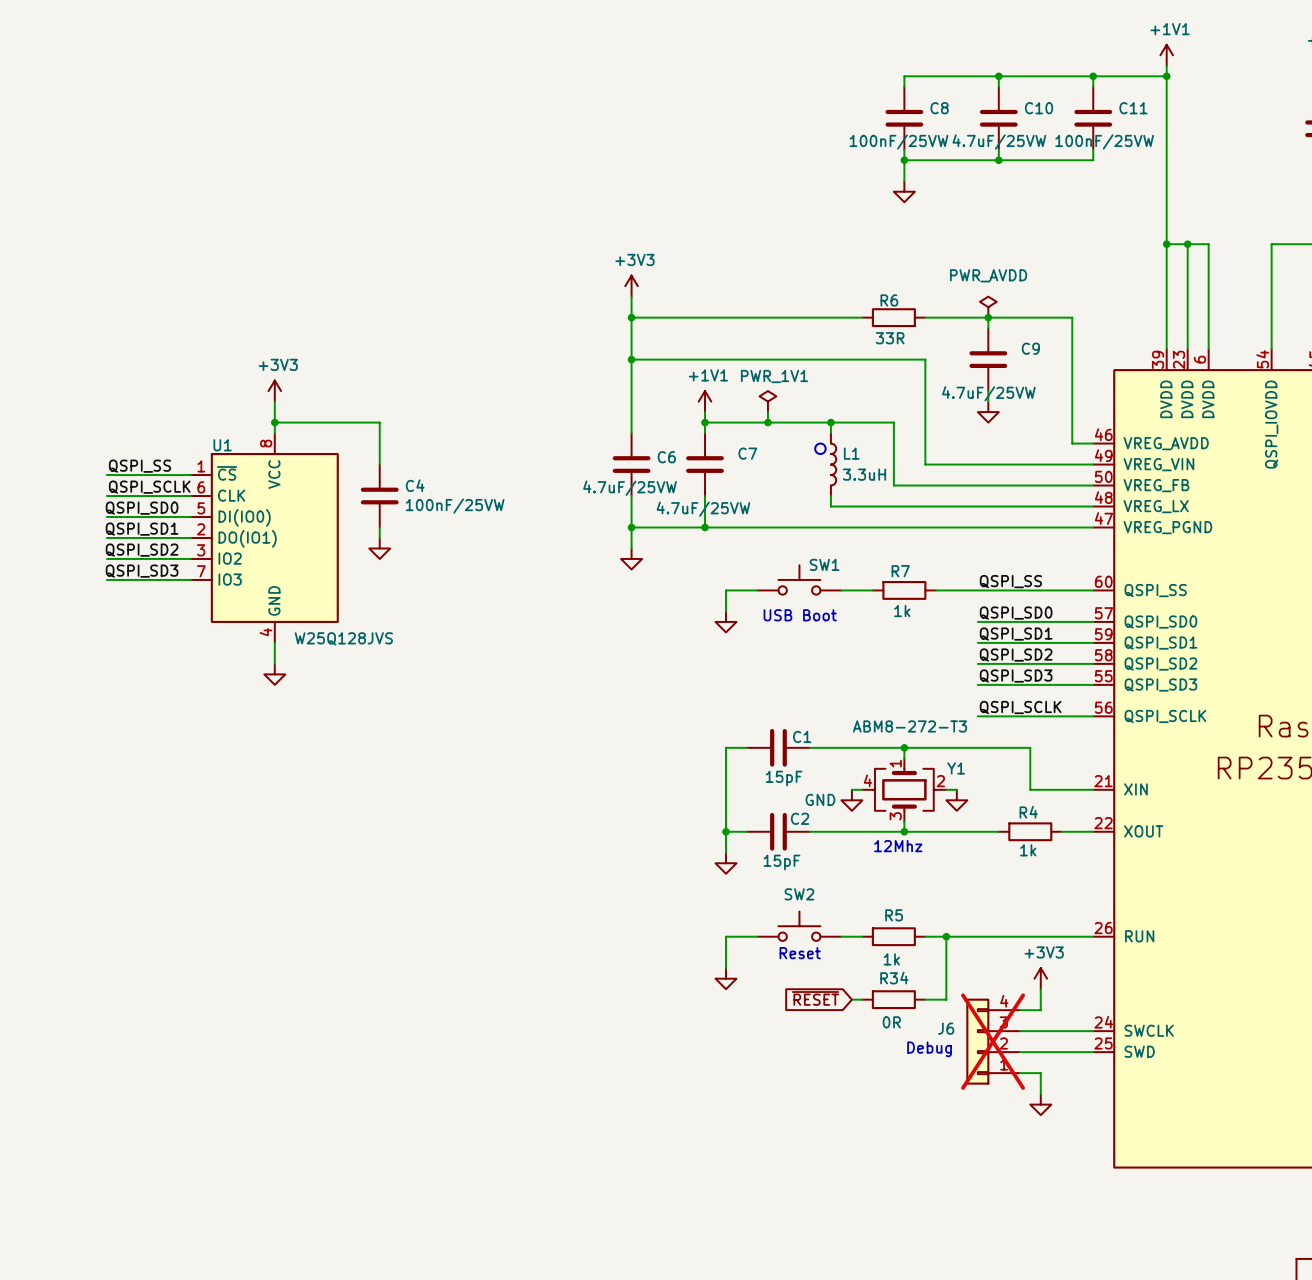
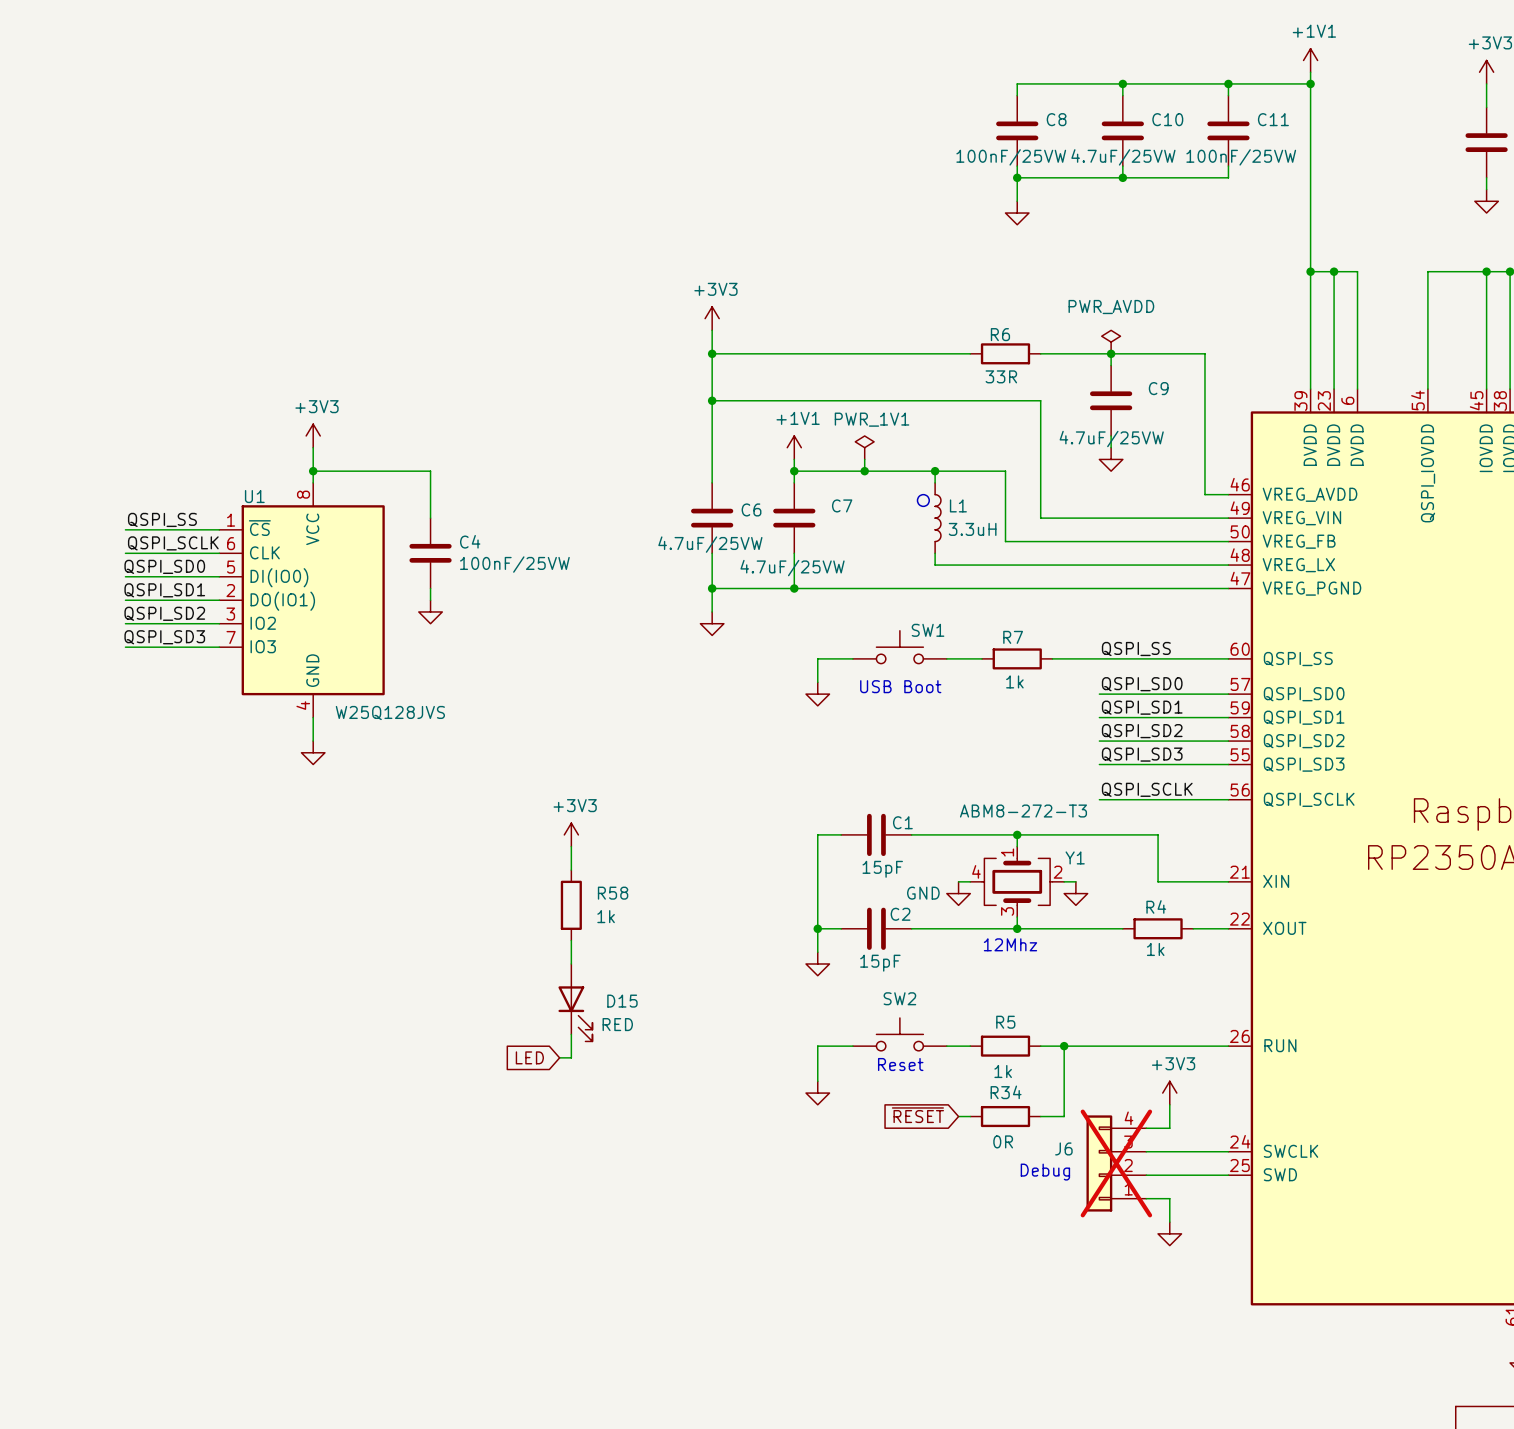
power symbol: none -> +3V3 (571, 834)
wire: none -> (571, 846) (571, 870)
R58: none -> 1k (571, 905)
wire: none -> (571, 940) (571, 964)
D15: none -> RED (575, 1002)
wire: none -> (571, 1034) (571, 1057) (559, 1057)
global label: none -> LED (529, 1057)

